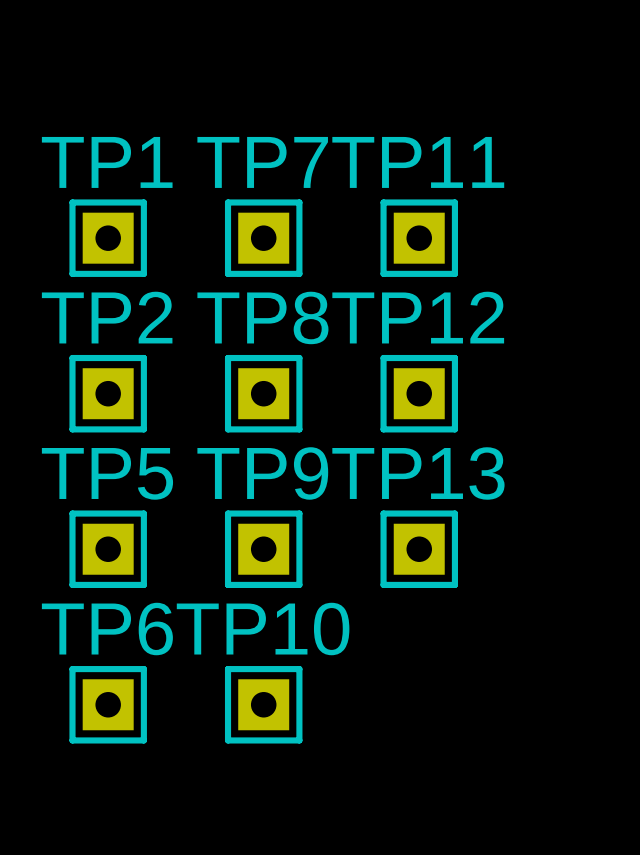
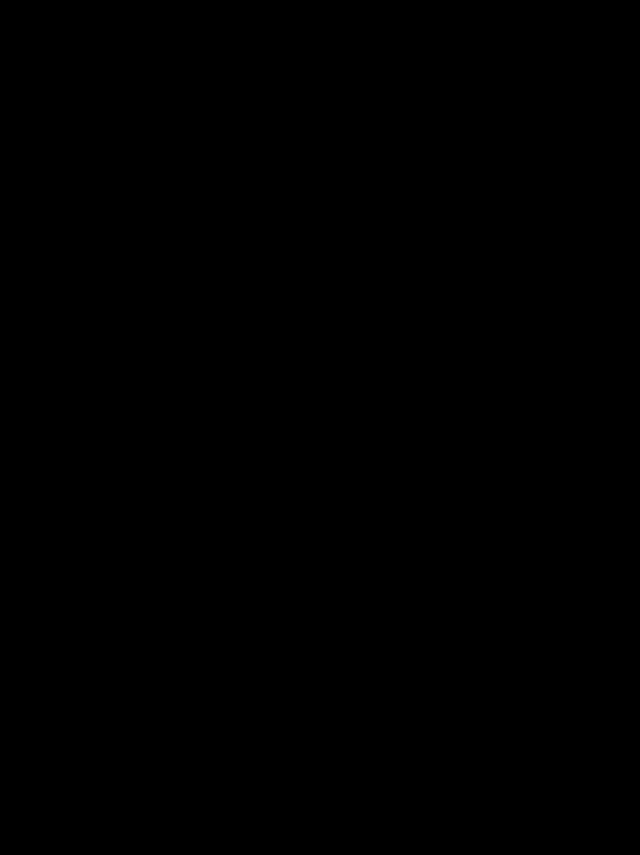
TP1: (108, 238) -> none
TP7: (263, 238) -> none
TP11: (419, 238) -> none
TP2: (108, 393) -> none
TP8: (263, 393) -> none
TP12: (419, 393) -> none
TP5: (108, 549) -> none
TP9: (263, 549) -> none
TP13: (419, 549) -> none
TP6: (108, 704) -> none
TP10: (263, 704) -> none

